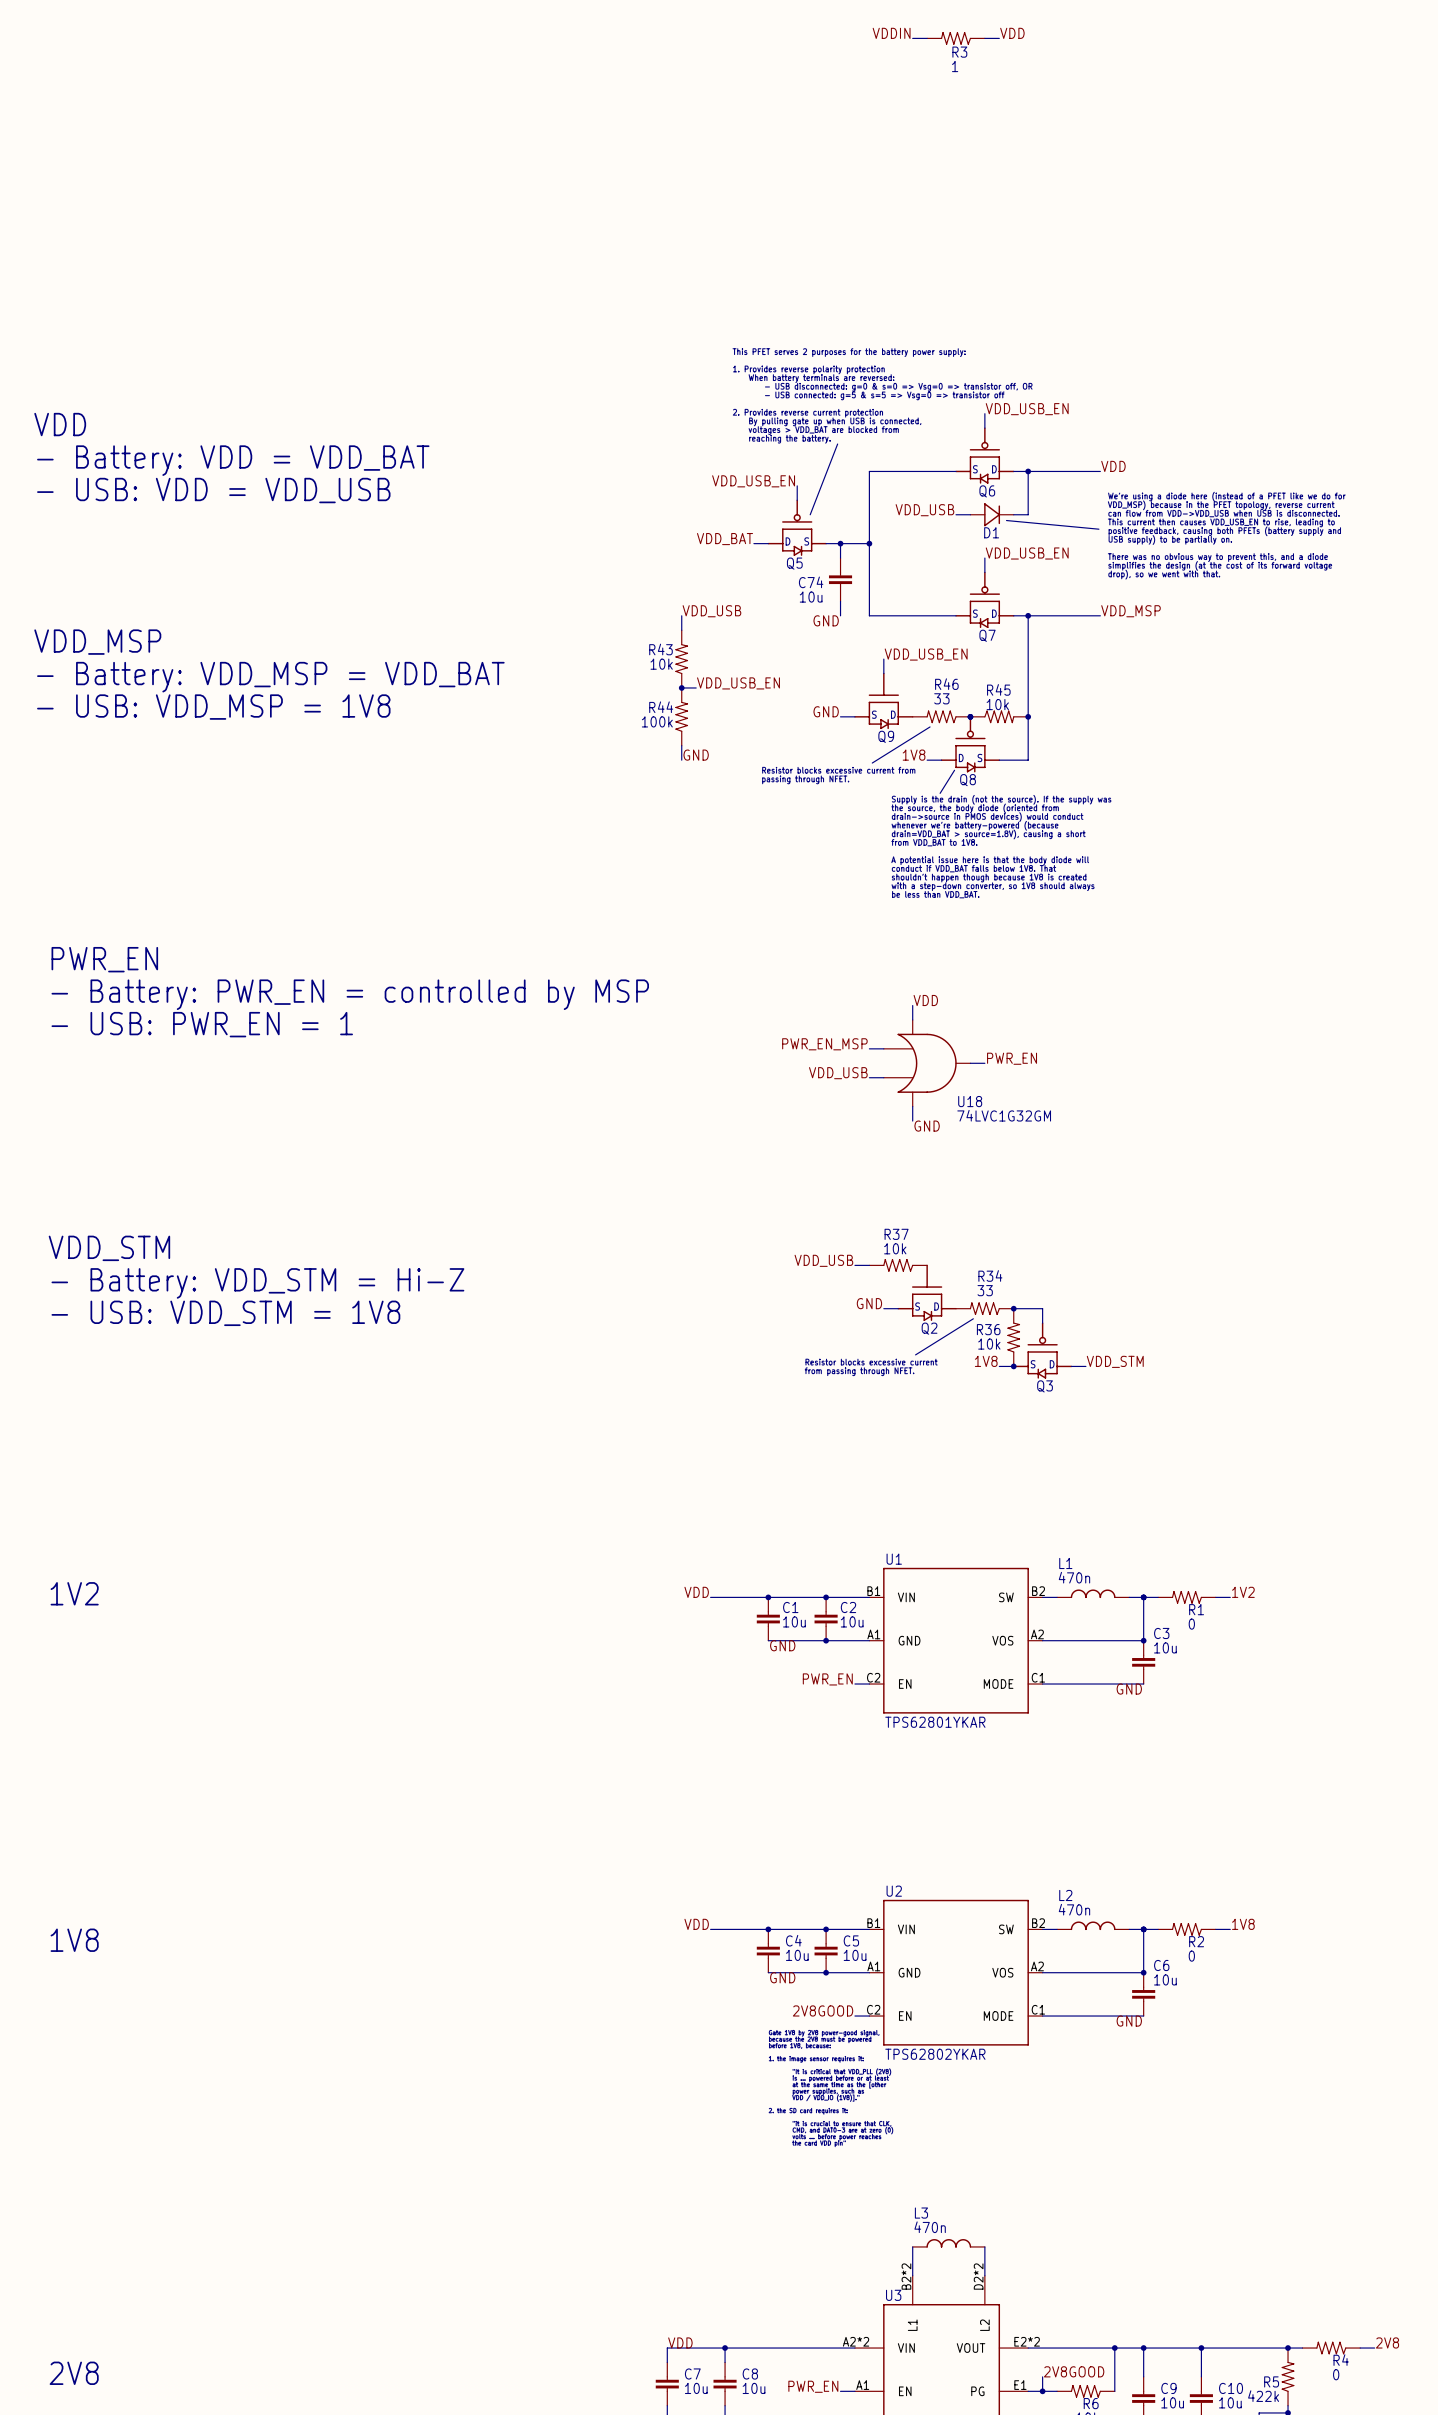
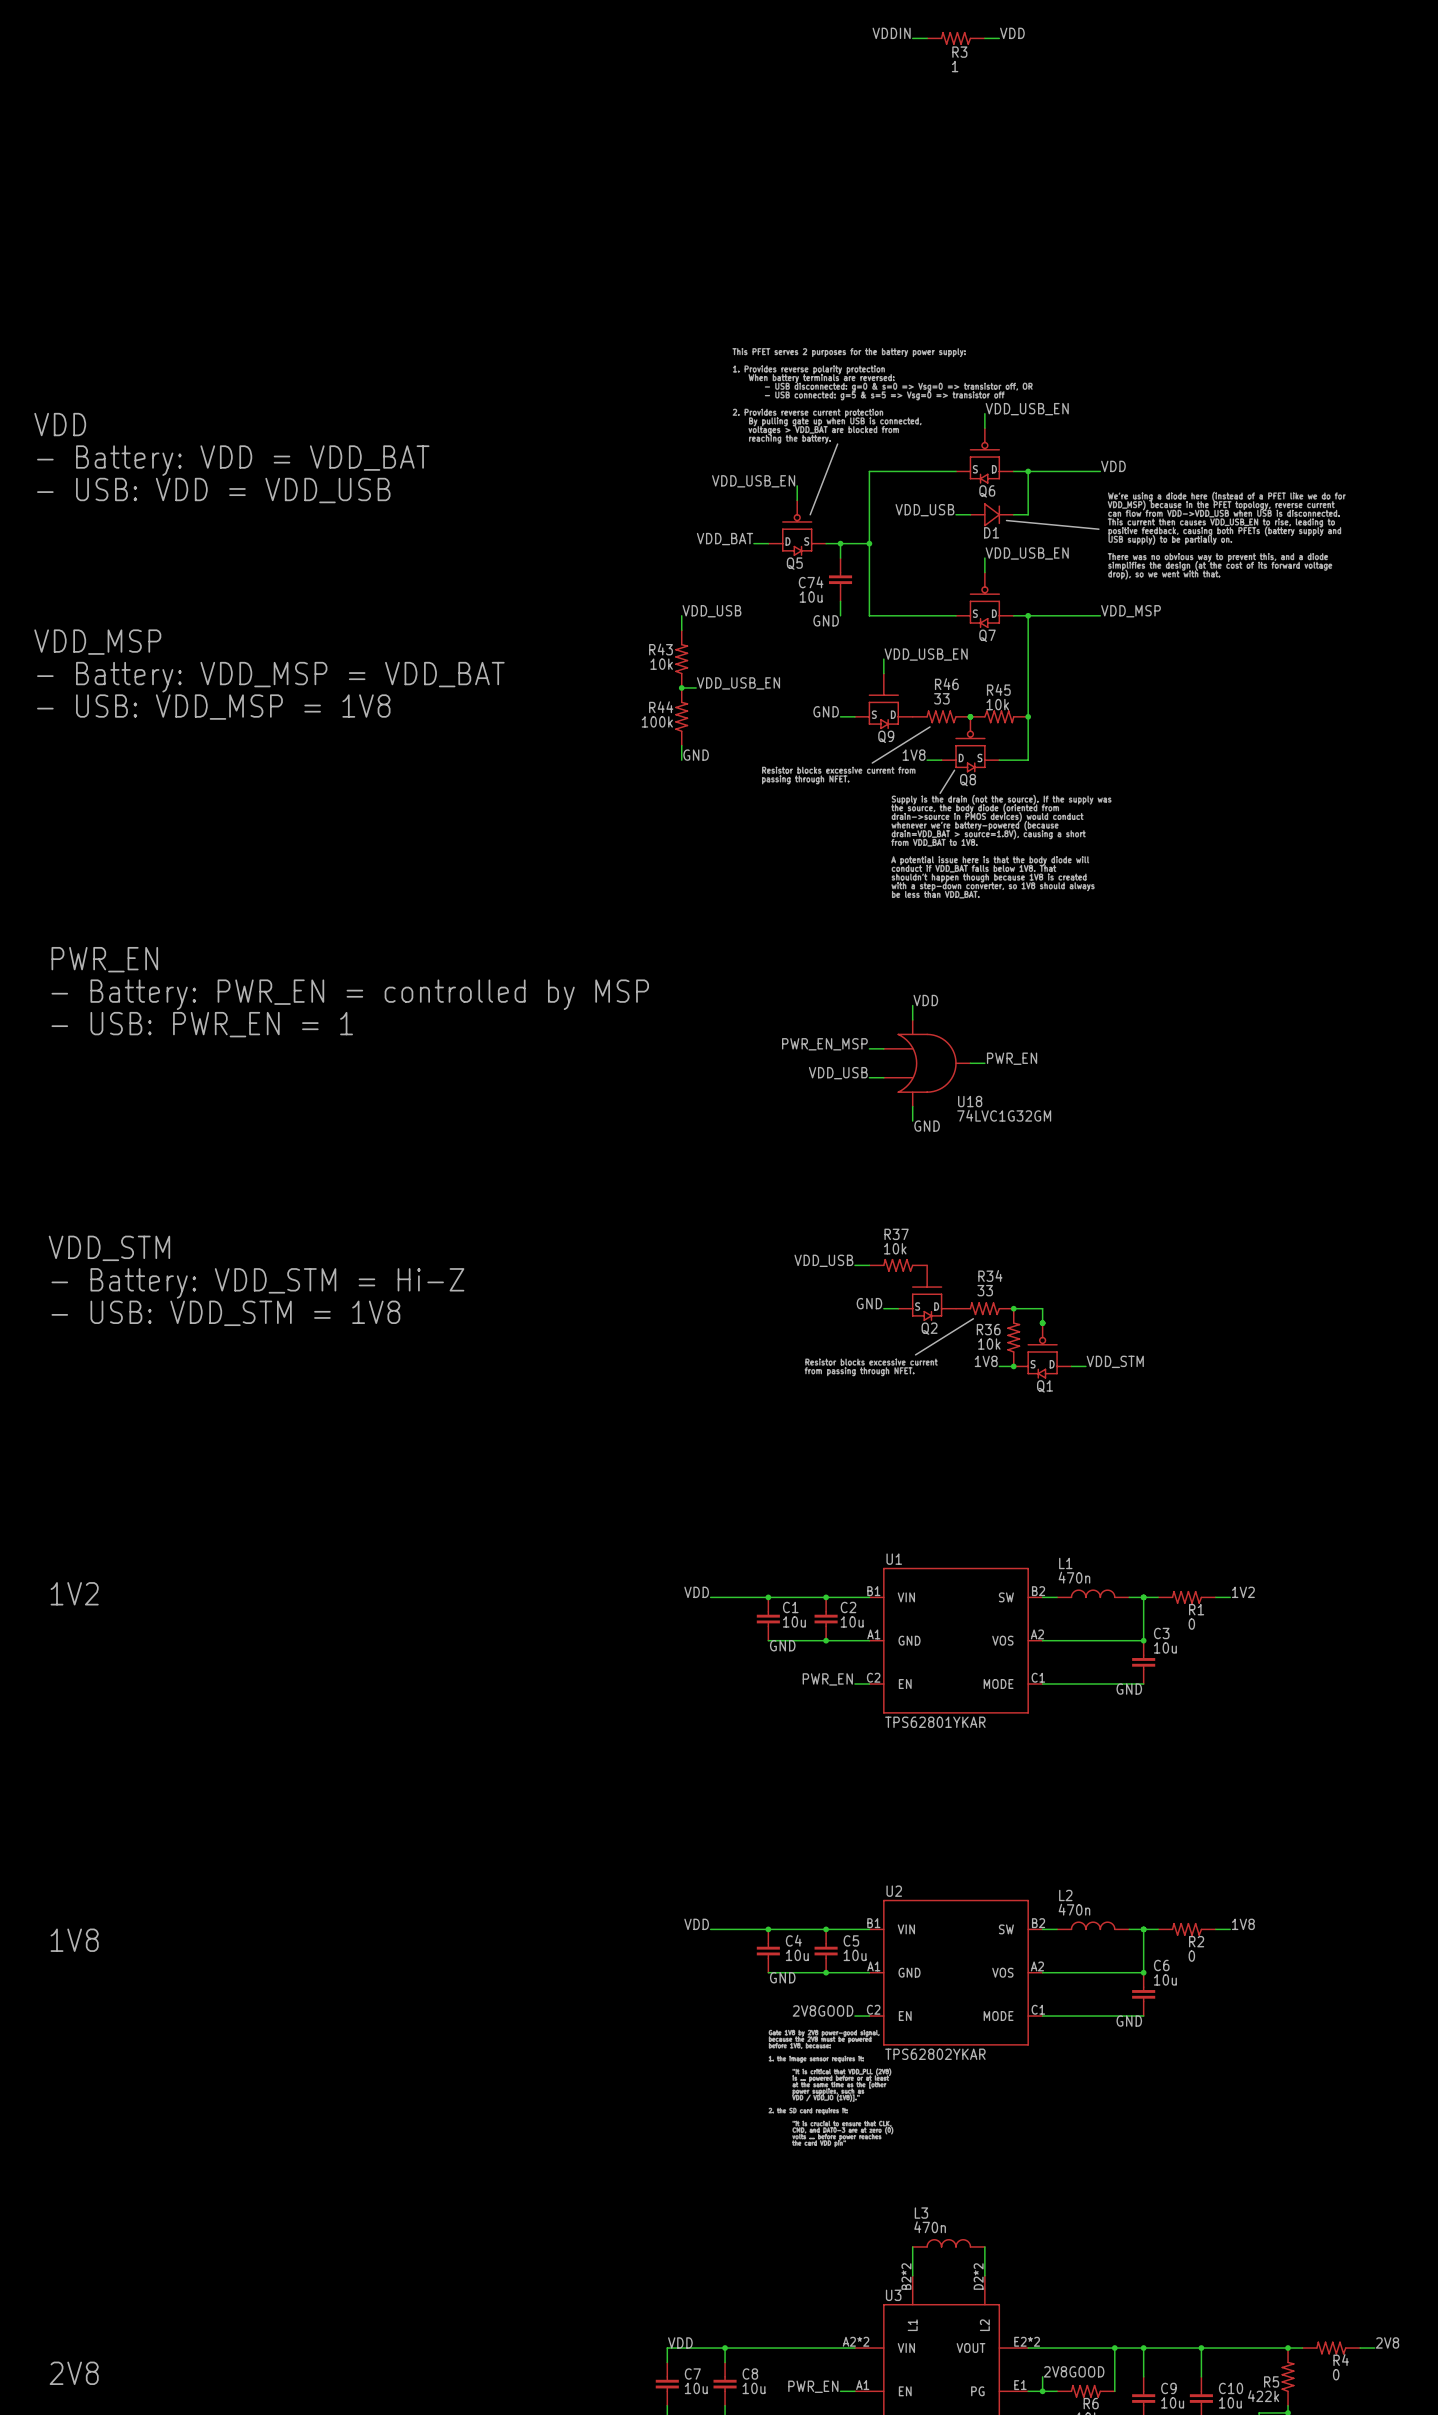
junction: none -> (1042, 1323)
Q3 name: Q3 (1045, 1386) -> Q1 (1045, 1386)

